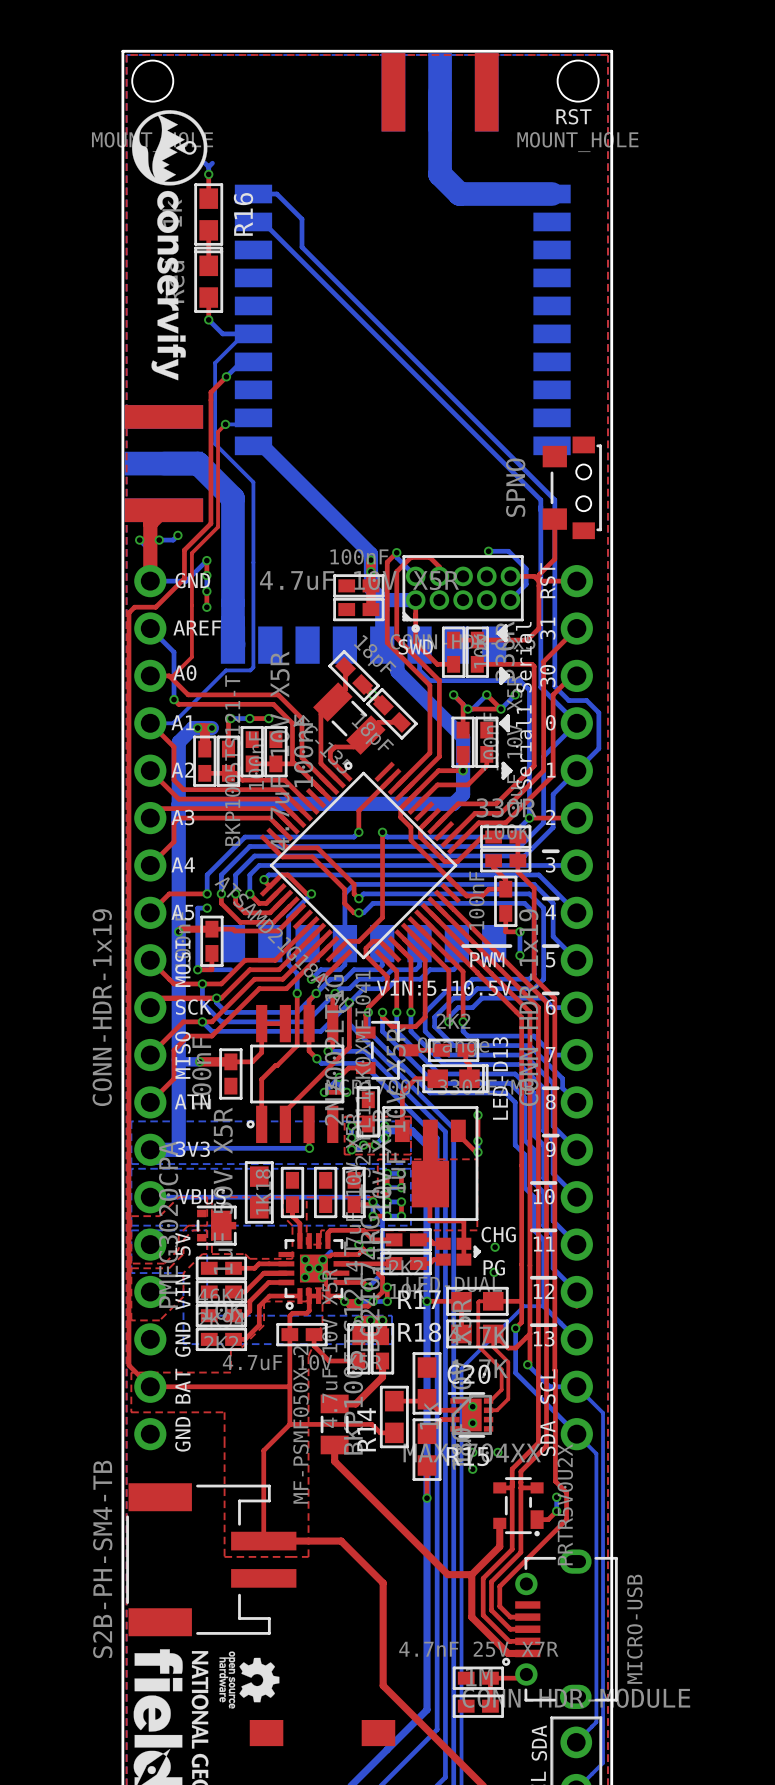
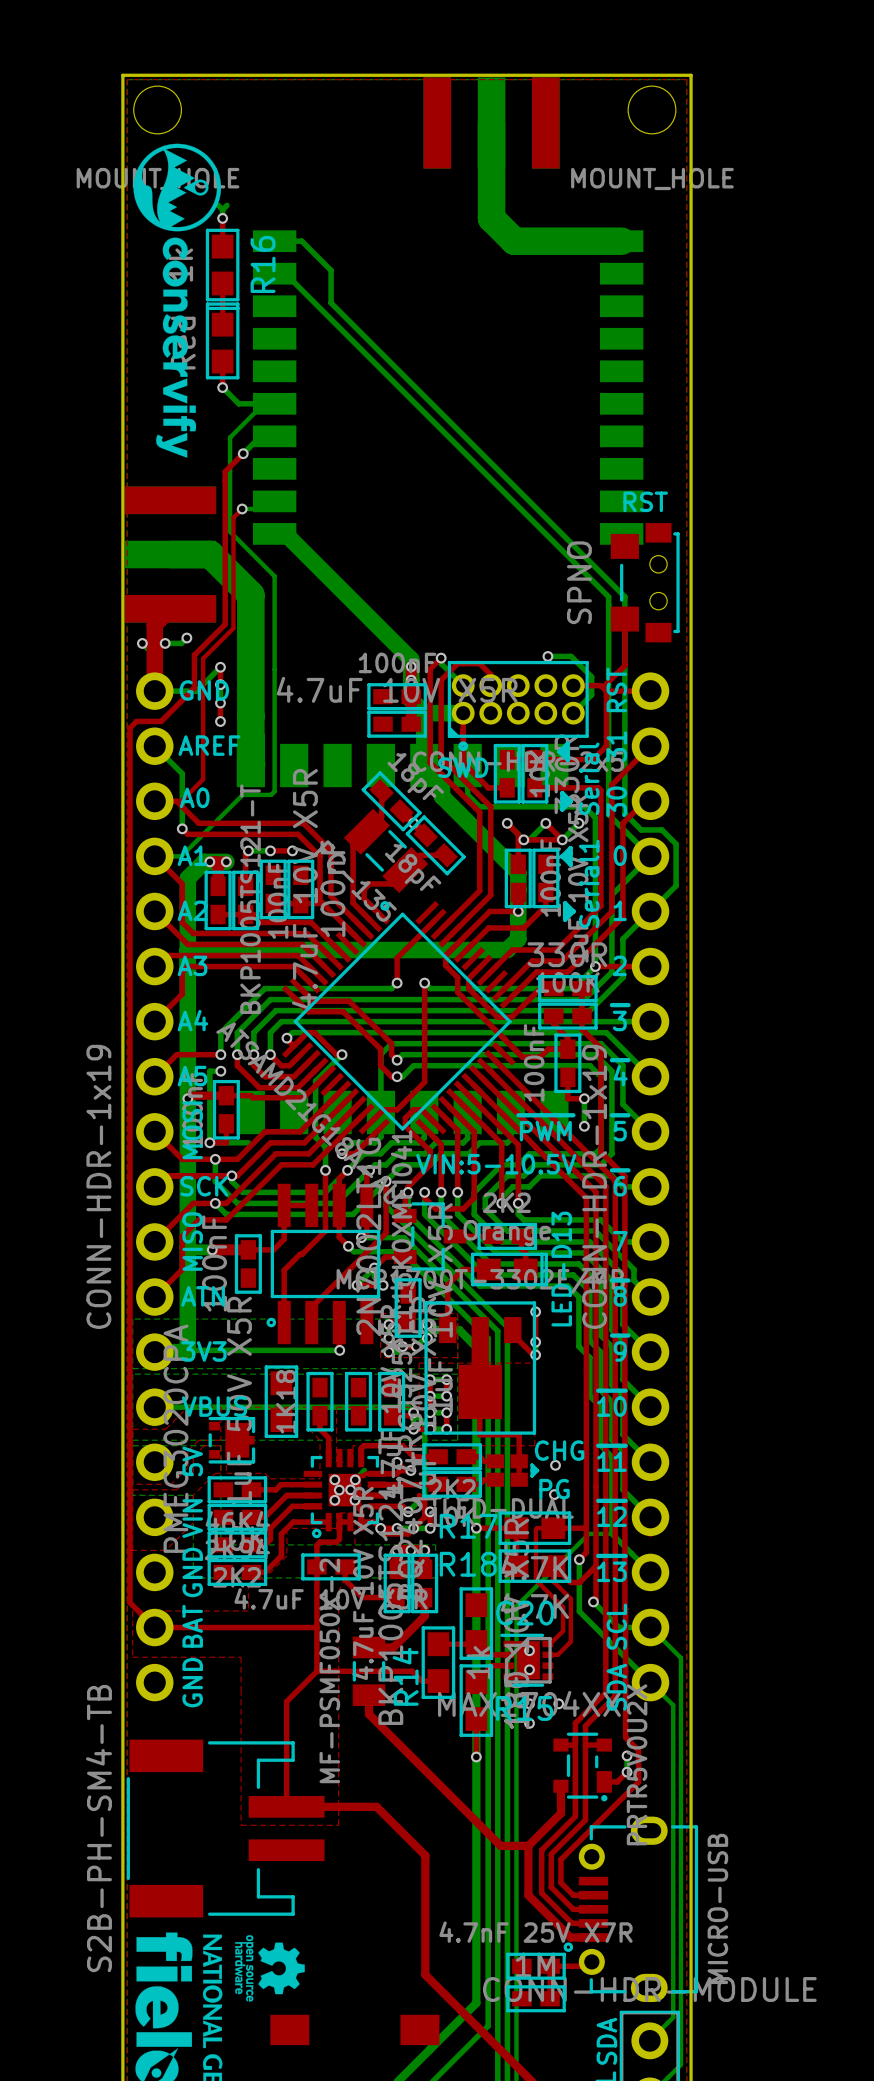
text position: RST (573, 116) -> RST (645, 501)

